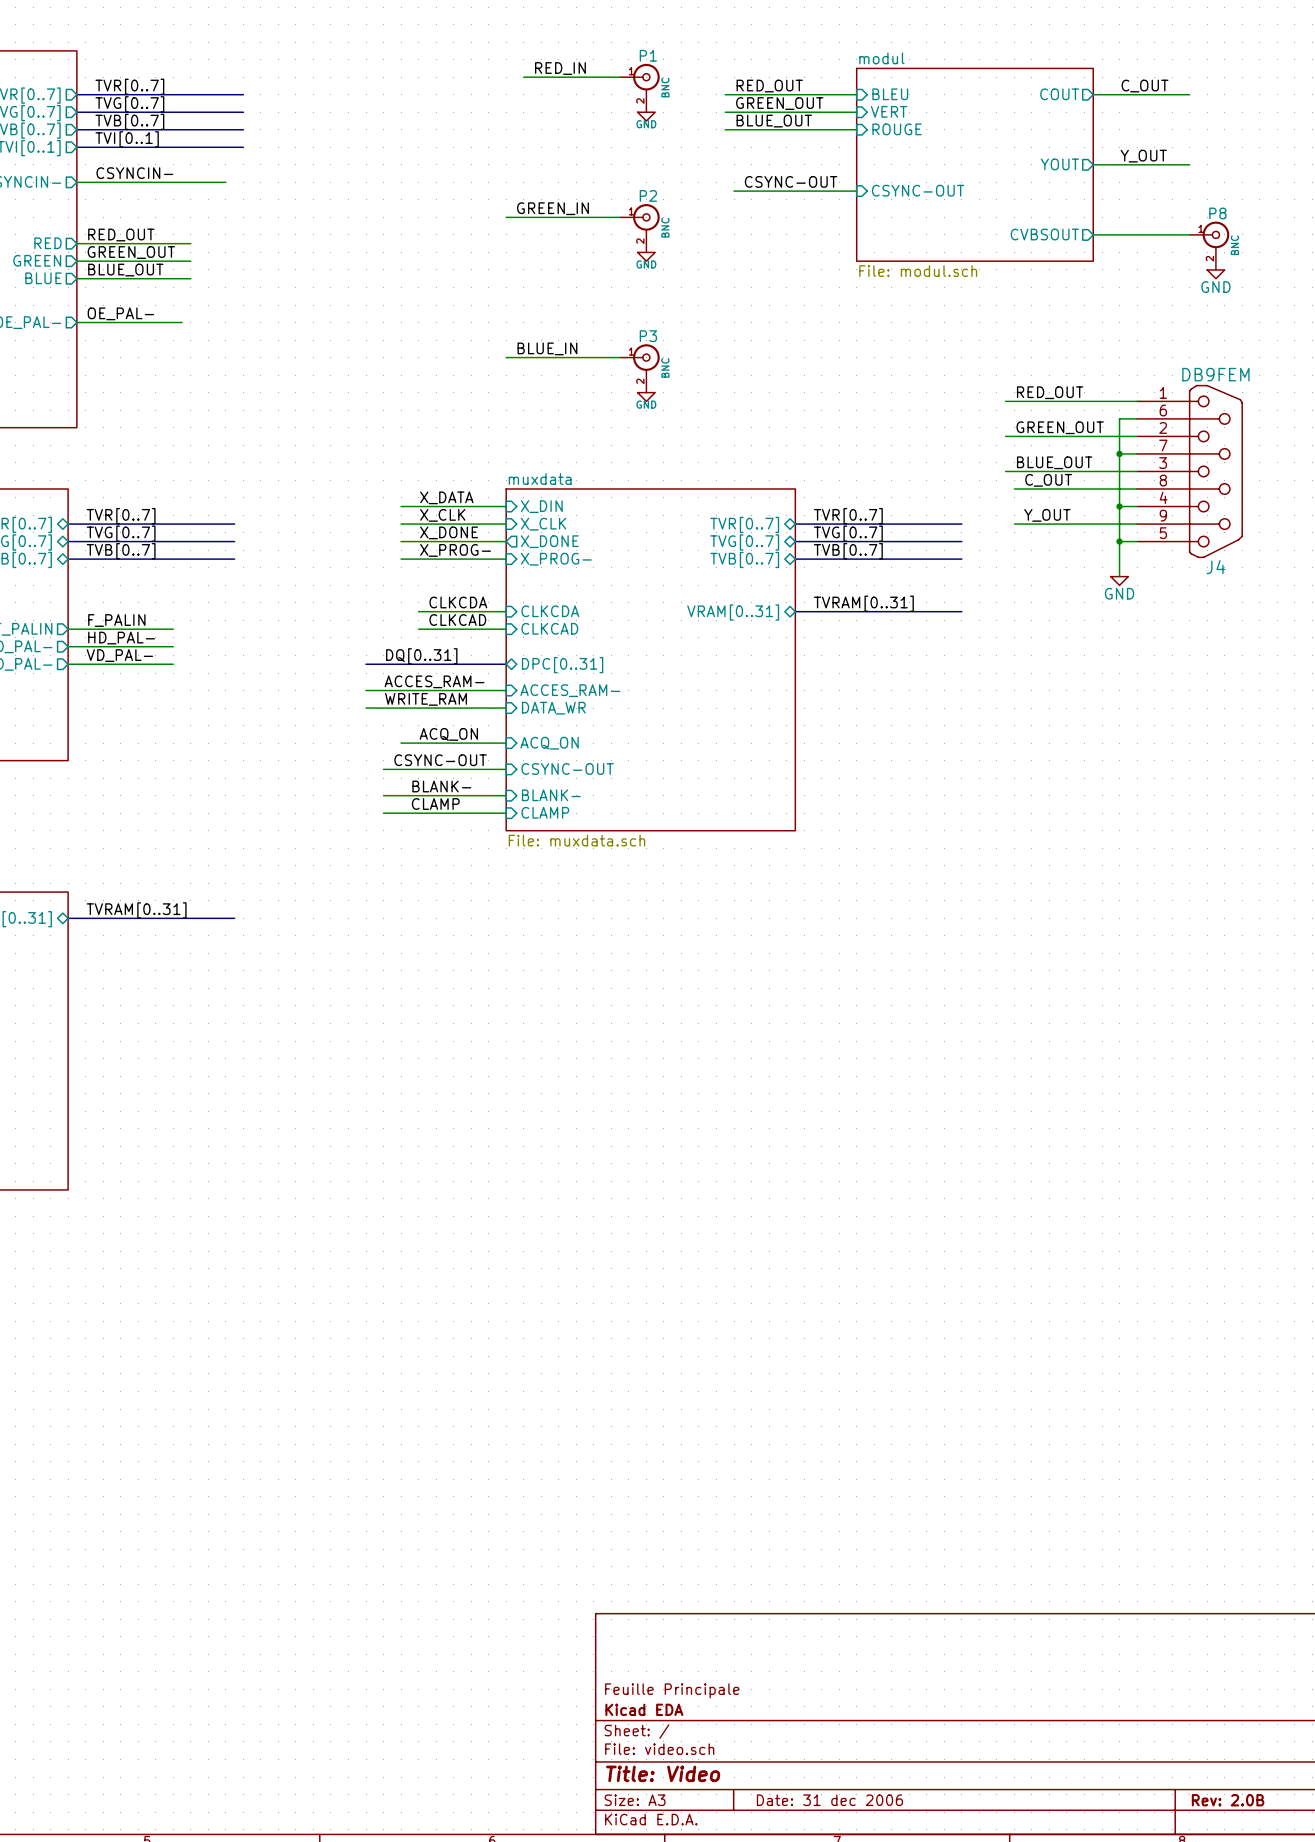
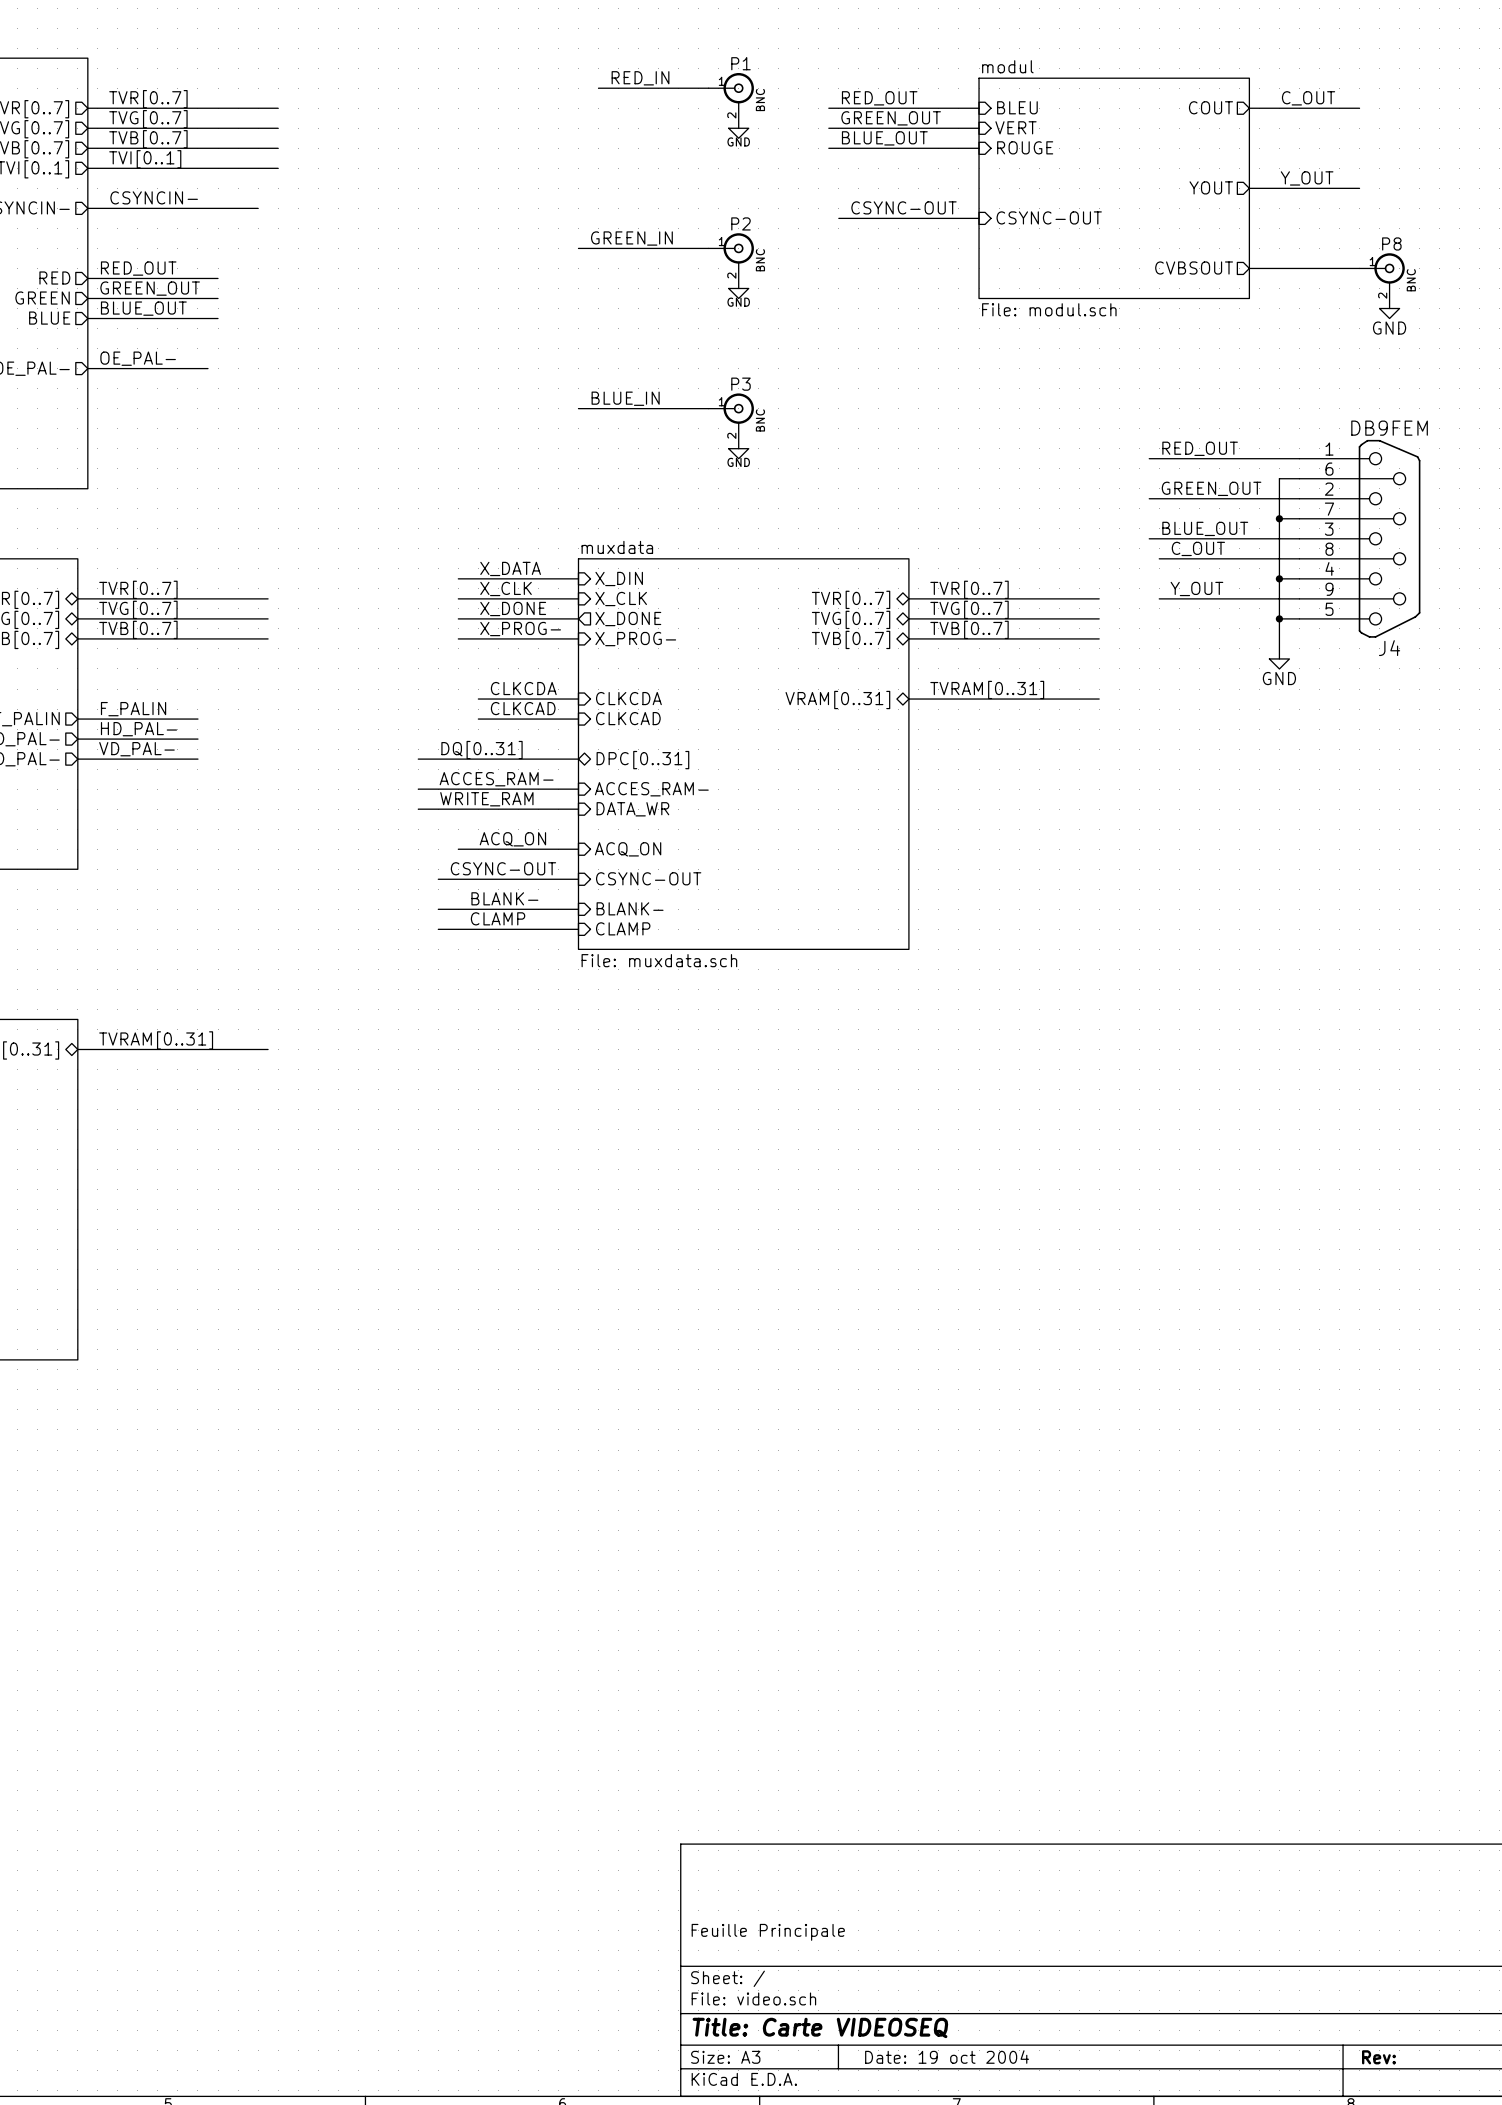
title block: Kicad EDA (644, 1709) -> none
title block: Title: Video (663, 1773) -> Title: Carte VIDEOSEQ (820, 2027)
title block: Date: 31 dec 2006 (829, 1800) -> Date: 19 oct 2004 (947, 2057)
title block: Rev: 2.0B (1228, 1800) -> Rev: (1378, 2057)

